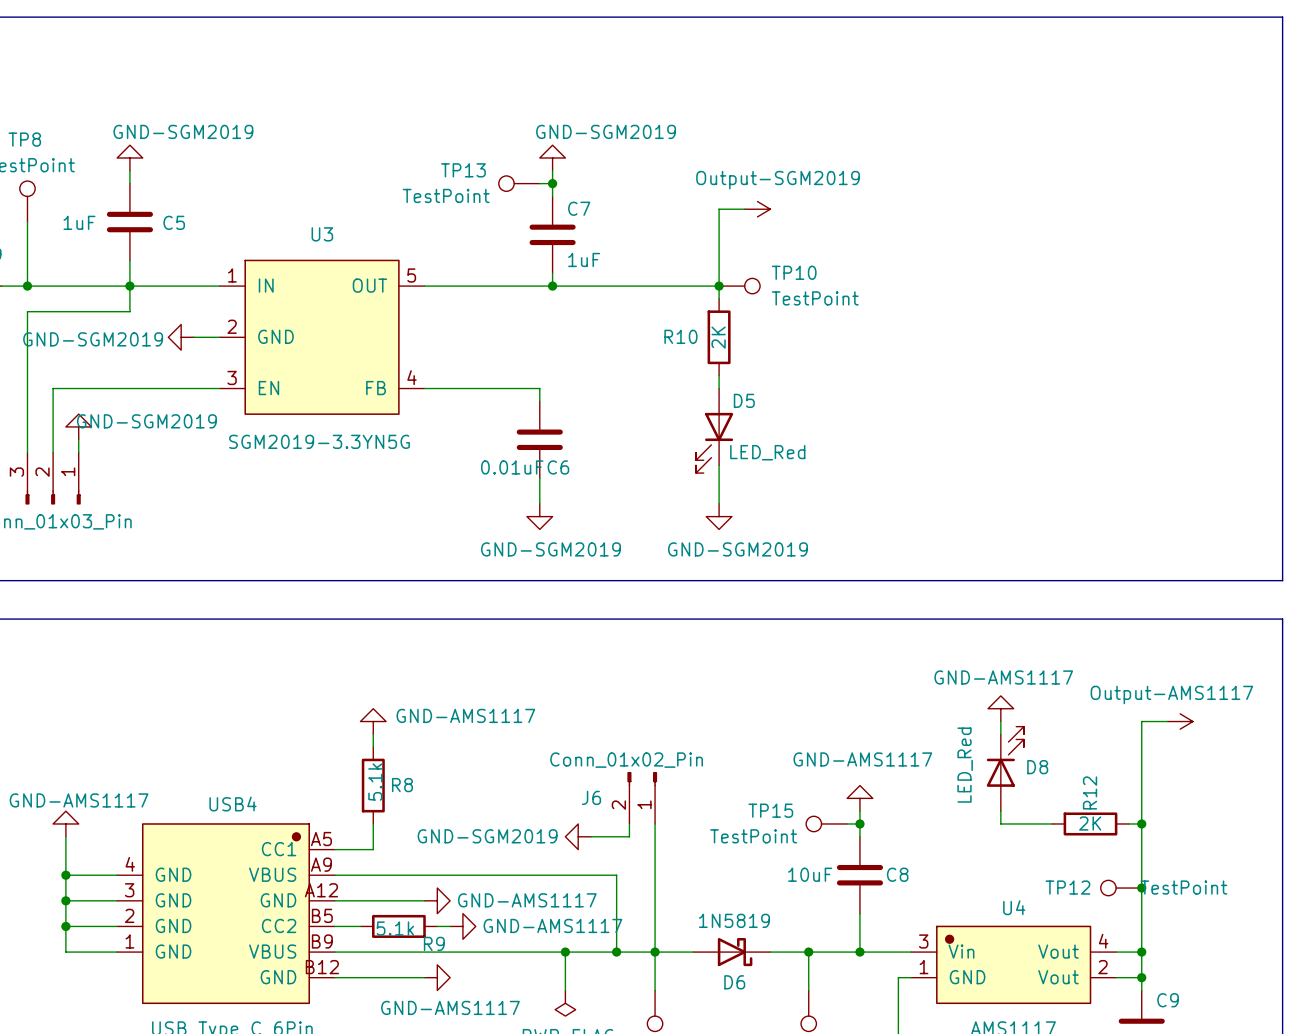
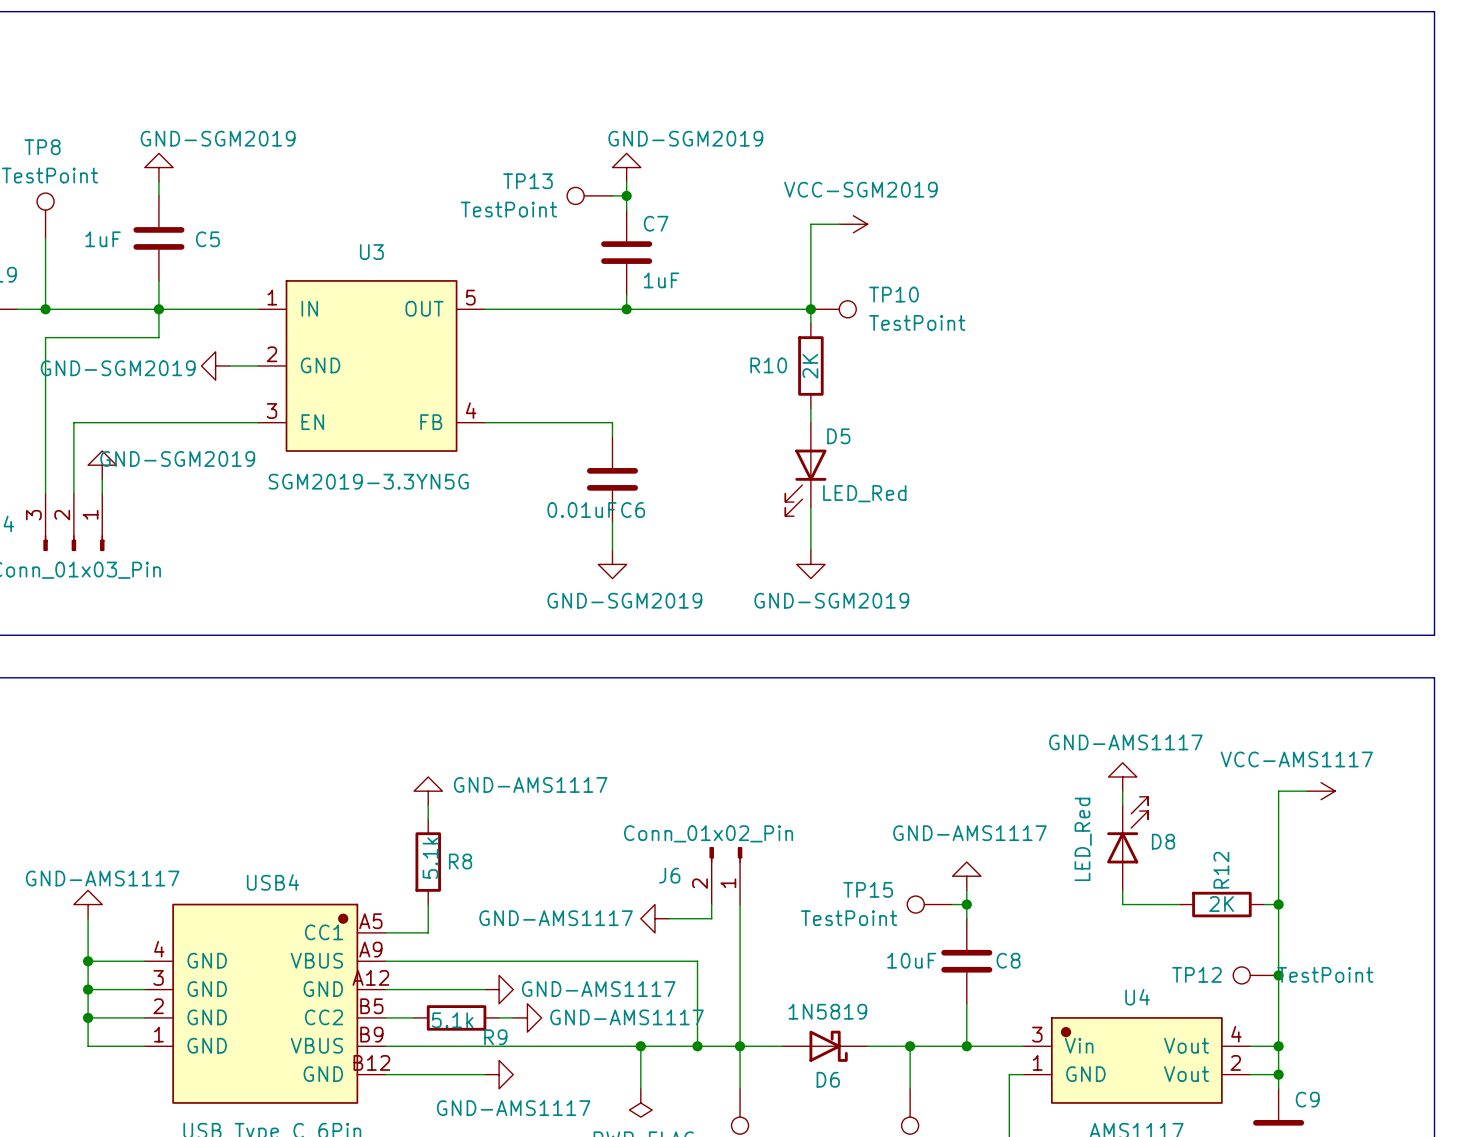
power symbol: Output-SGM2019 (757, 209) -> VCC-SGM2019 (853, 224)
power symbol: Output-AMS1117 (1180, 721) -> VCC-AMS1117 (1321, 791)
power symbol: GND-SGM2019 (578, 836) -> GND-AMS1117 (654, 918)

